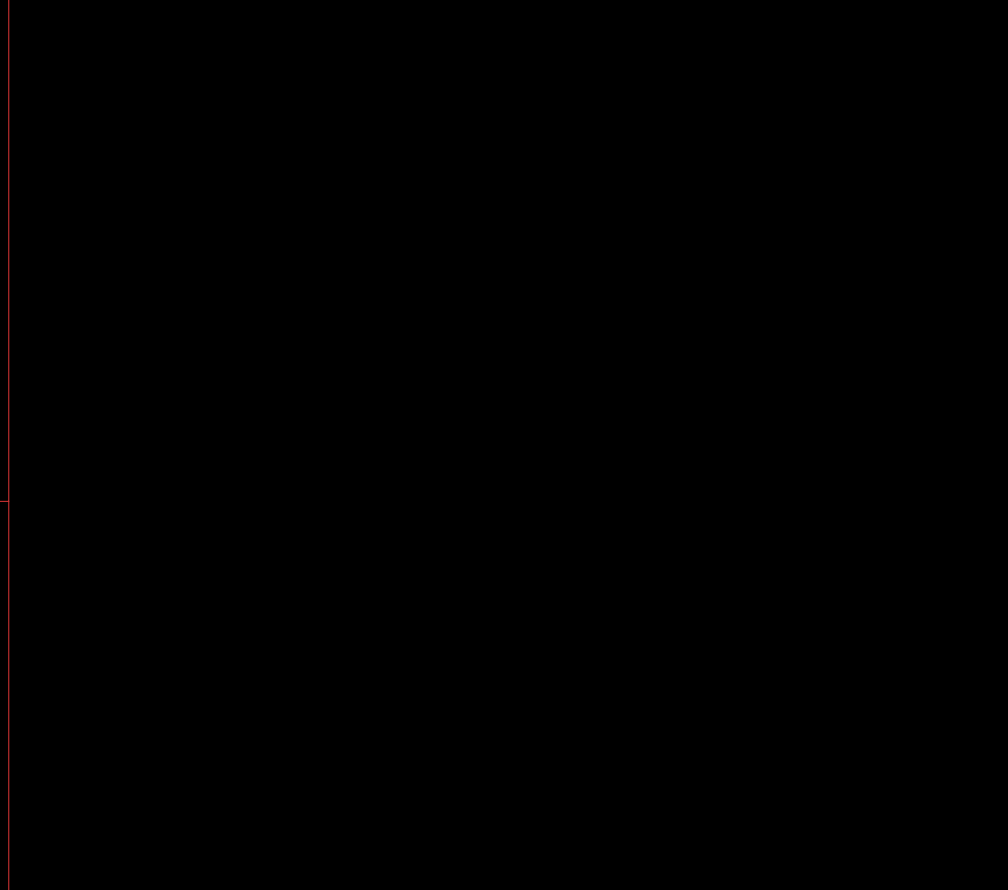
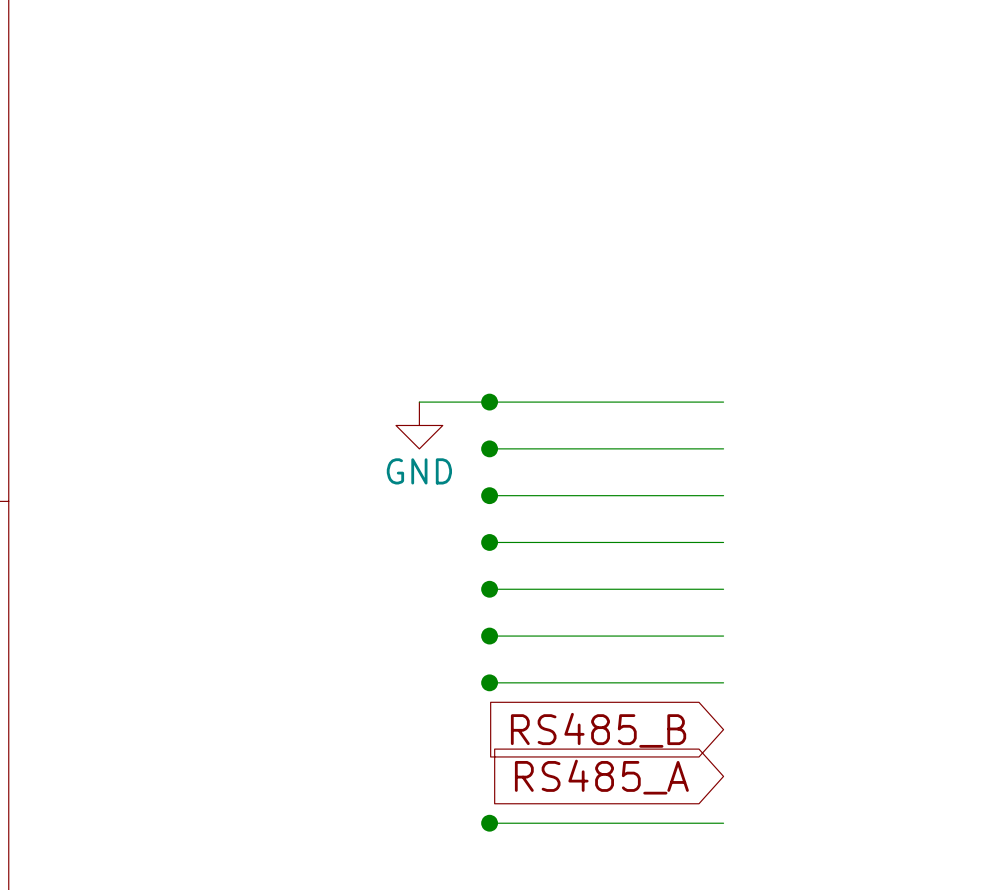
wire: none -> (419, 402) (723, 402)
junction: none -> (489, 402)
power symbol: none -> GND (419, 425)
wire: none -> (489, 448) (723, 448)
junction: none -> (489, 448)
wire: none -> (489, 495) (723, 495)
junction: none -> (489, 495)
wire: none -> (489, 542) (723, 542)
junction: none -> (489, 542)
wire: none -> (489, 589) (723, 589)
junction: none -> (489, 589)
wire: none -> (489, 636) (723, 636)
junction: none -> (489, 636)
wire: none -> (489, 682) (723, 682)
junction: none -> (489, 682)
global label: none -> RS485_B (598, 730)
global label: none -> RS485_A (601, 777)
wire: none -> (489, 823) (723, 823)
junction: none -> (489, 823)

